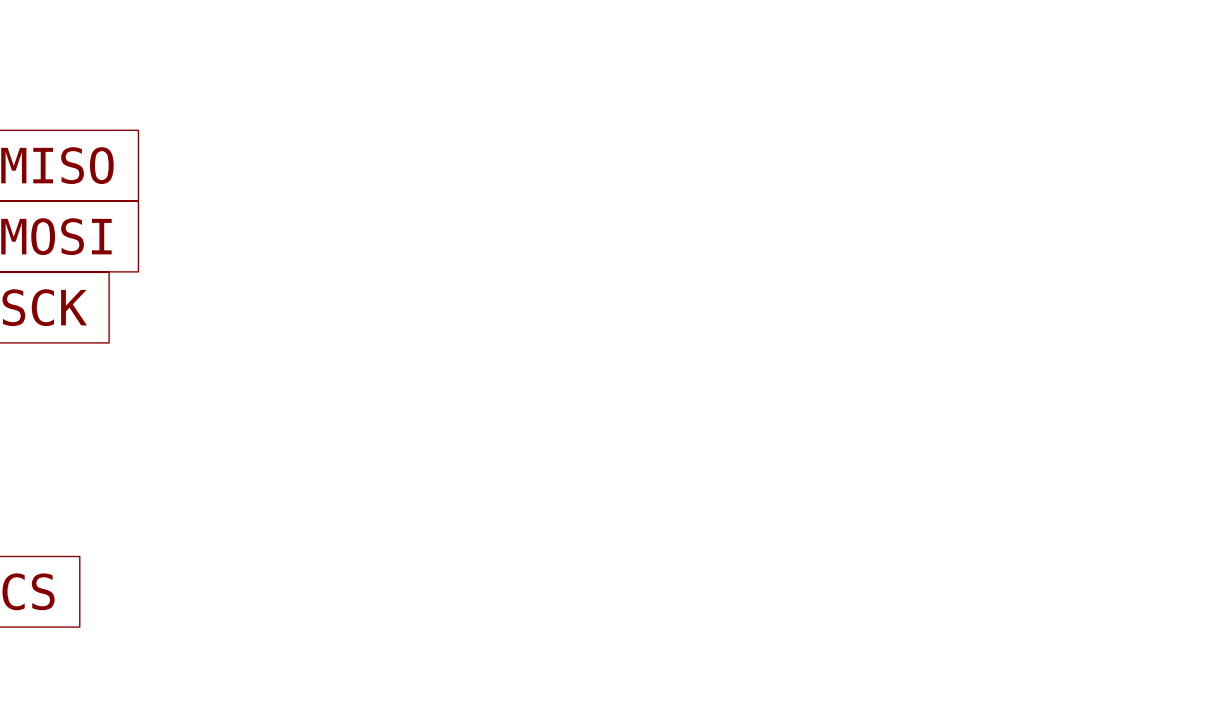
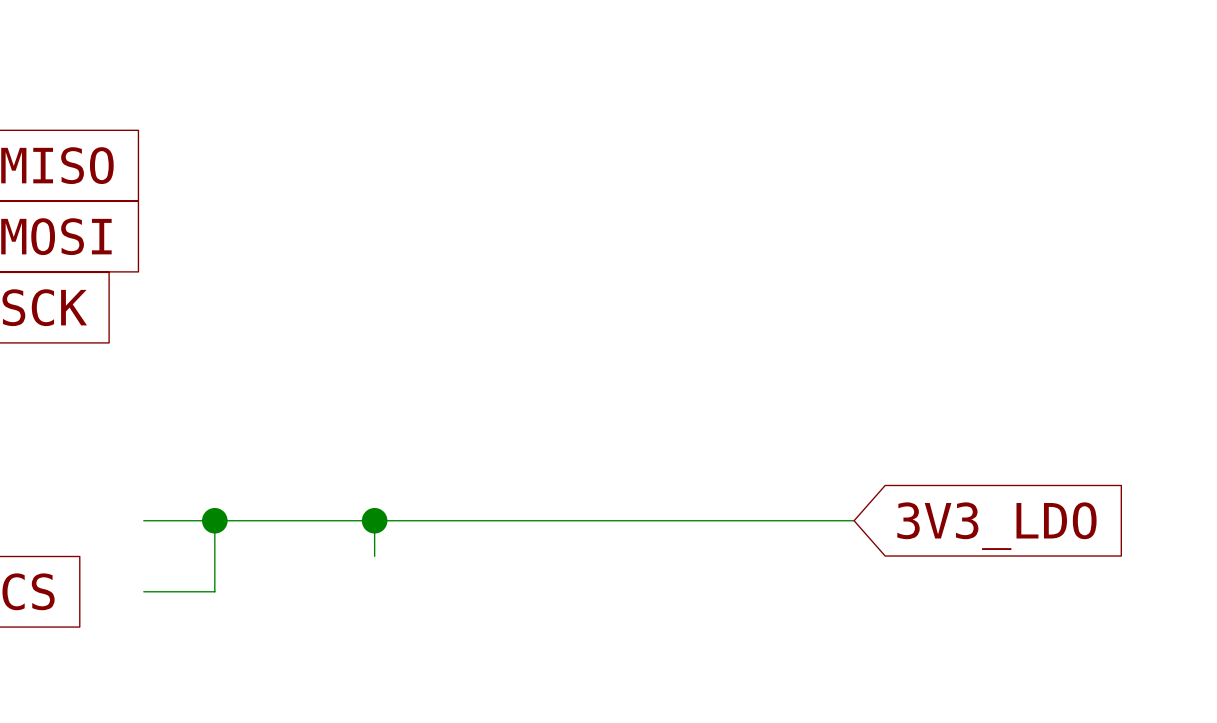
wire: none -> (143, 520) (854, 520)
wire: none -> (214, 520) (214, 591) (143, 591)
junction: none -> (214, 520)
wire: none -> (374, 520) (374, 556)
junction: none -> (374, 520)
global label: none -> 3V3_LDO (996, 526)

